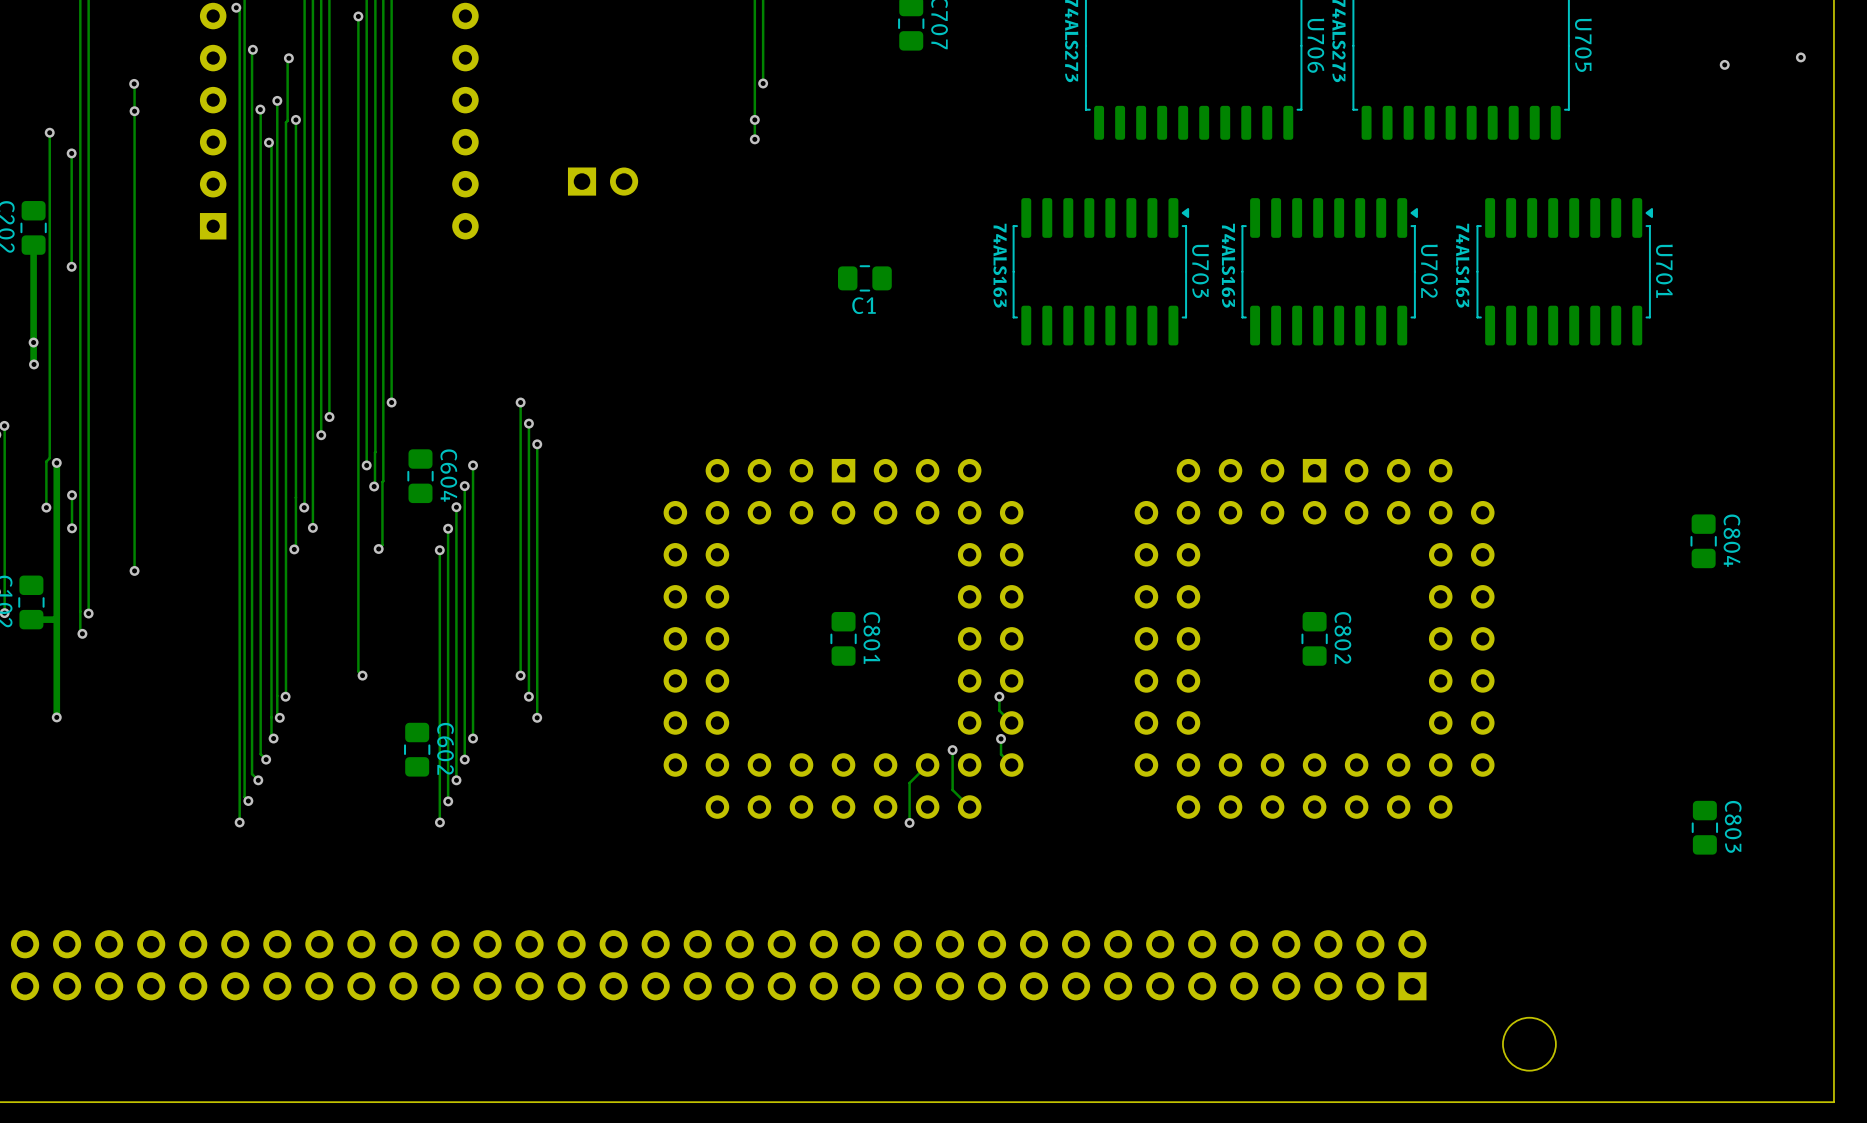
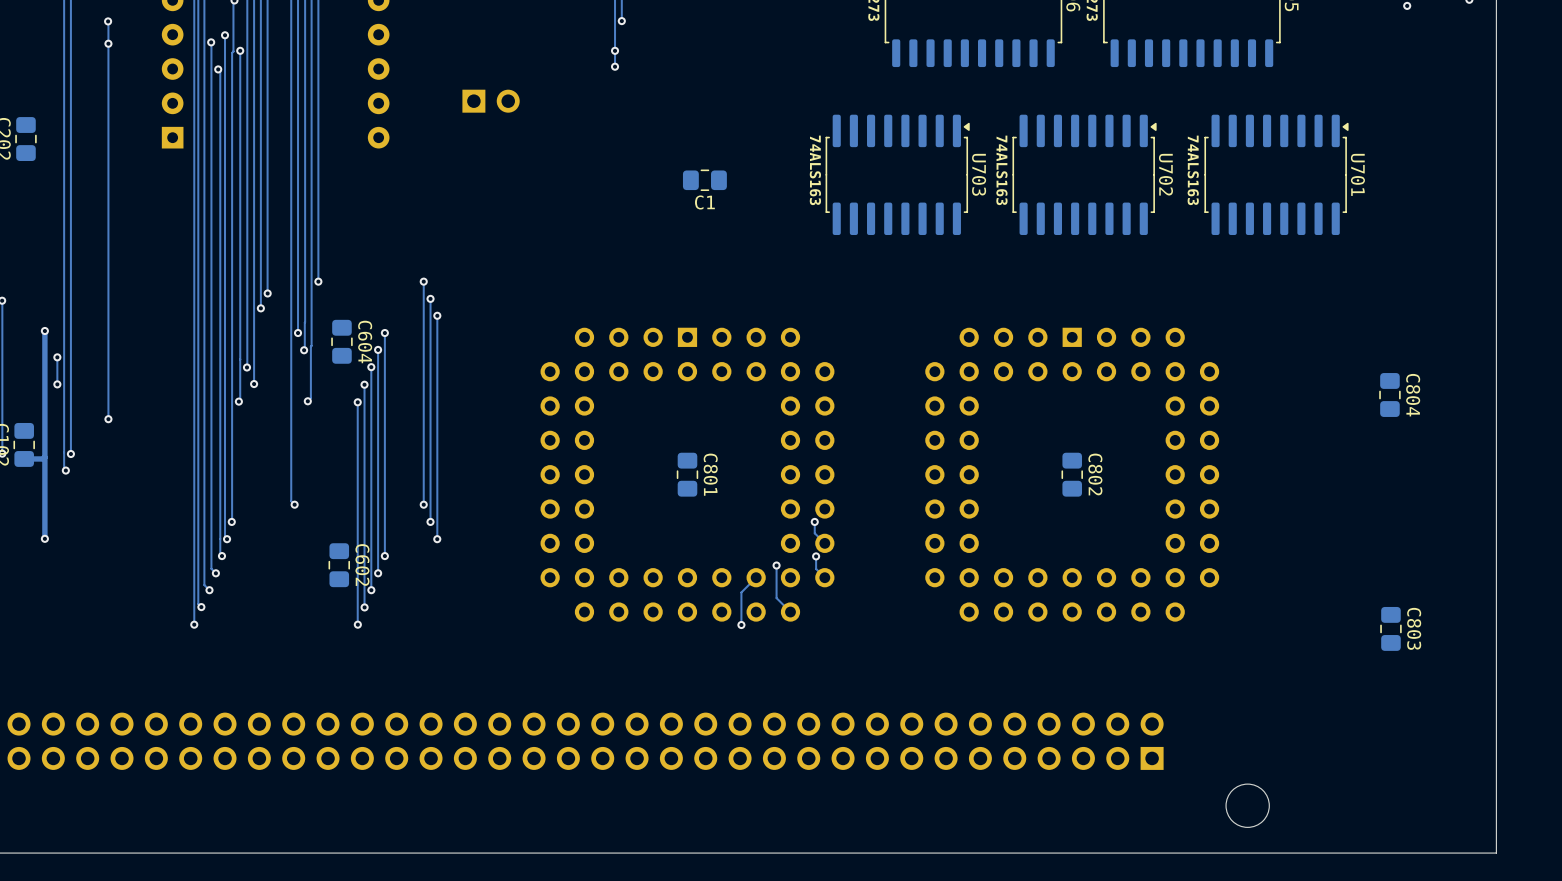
track: (49, 132) (49, 458) (46, 461) (46, 507) -> none
via: (49, 132) -> none
track: (71, 153) (71, 266) -> none
via: (71, 153) -> none
track: (33, 245) (34, 364) -> none
via: (71, 266) -> none
via: (33, 342) -> none
via: (34, 364) -> none
via: (46, 507) -> none

